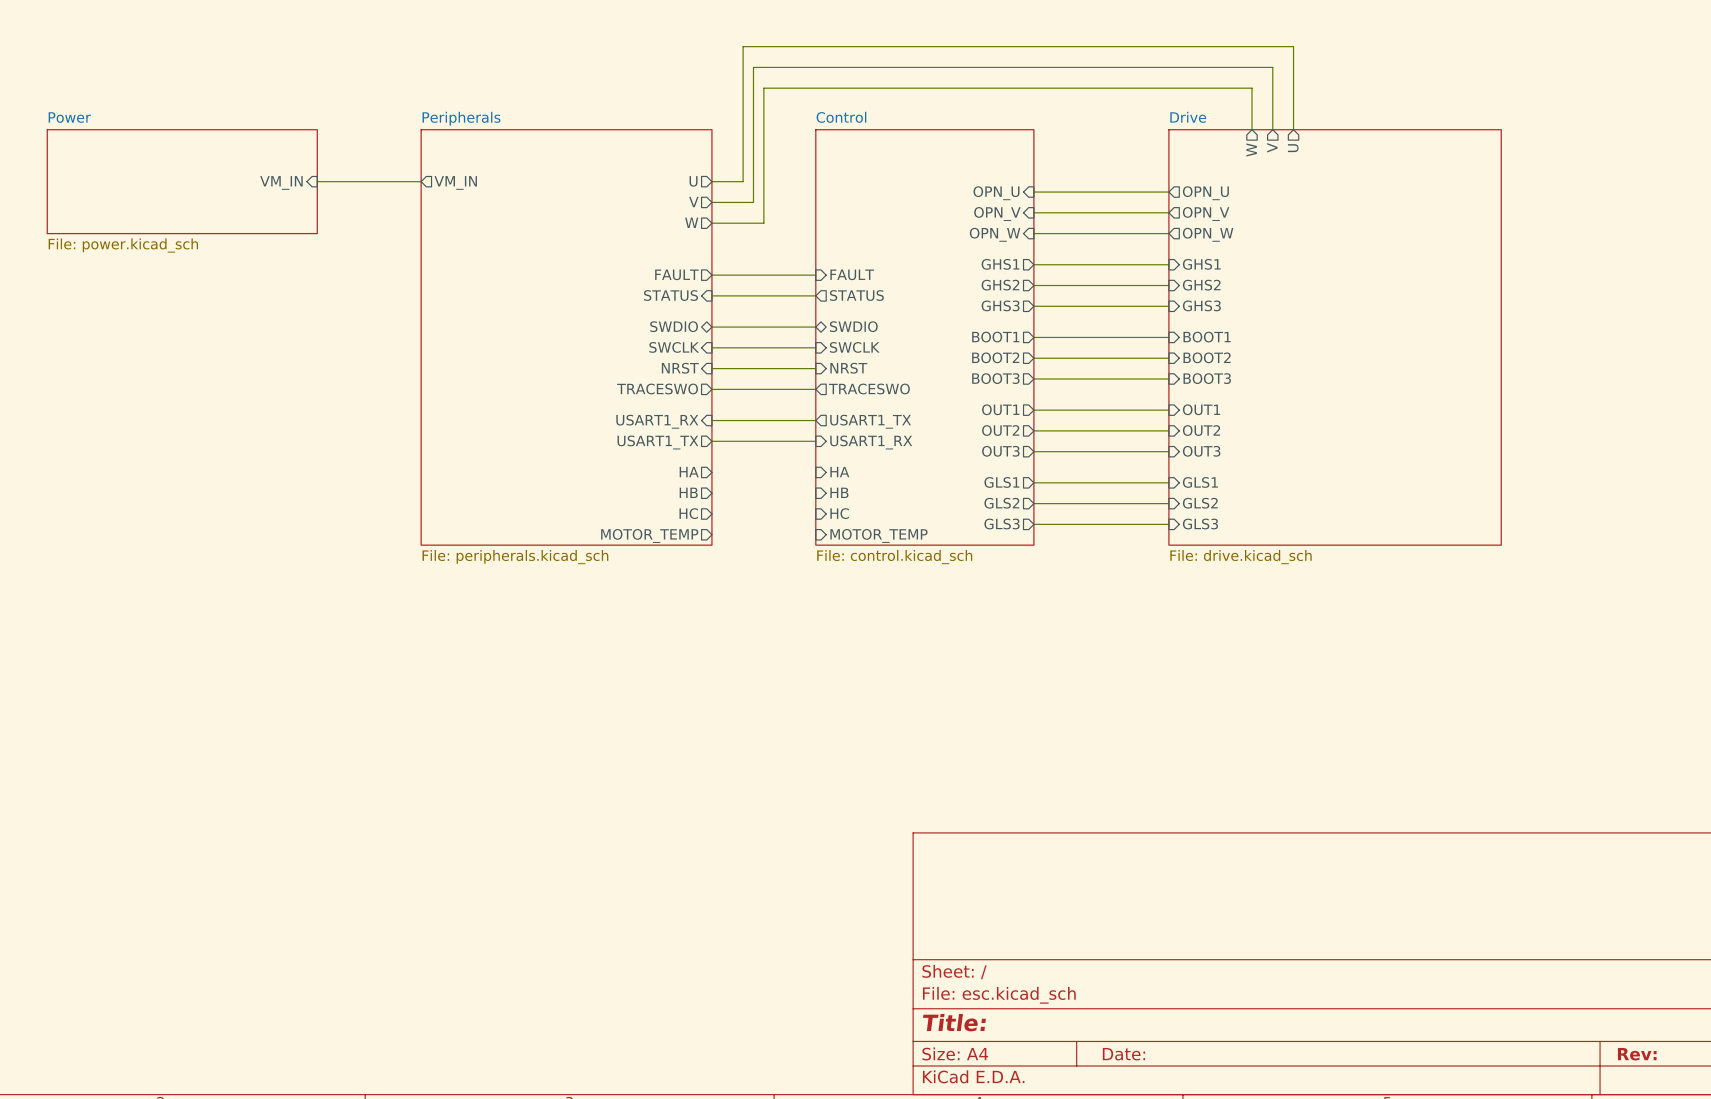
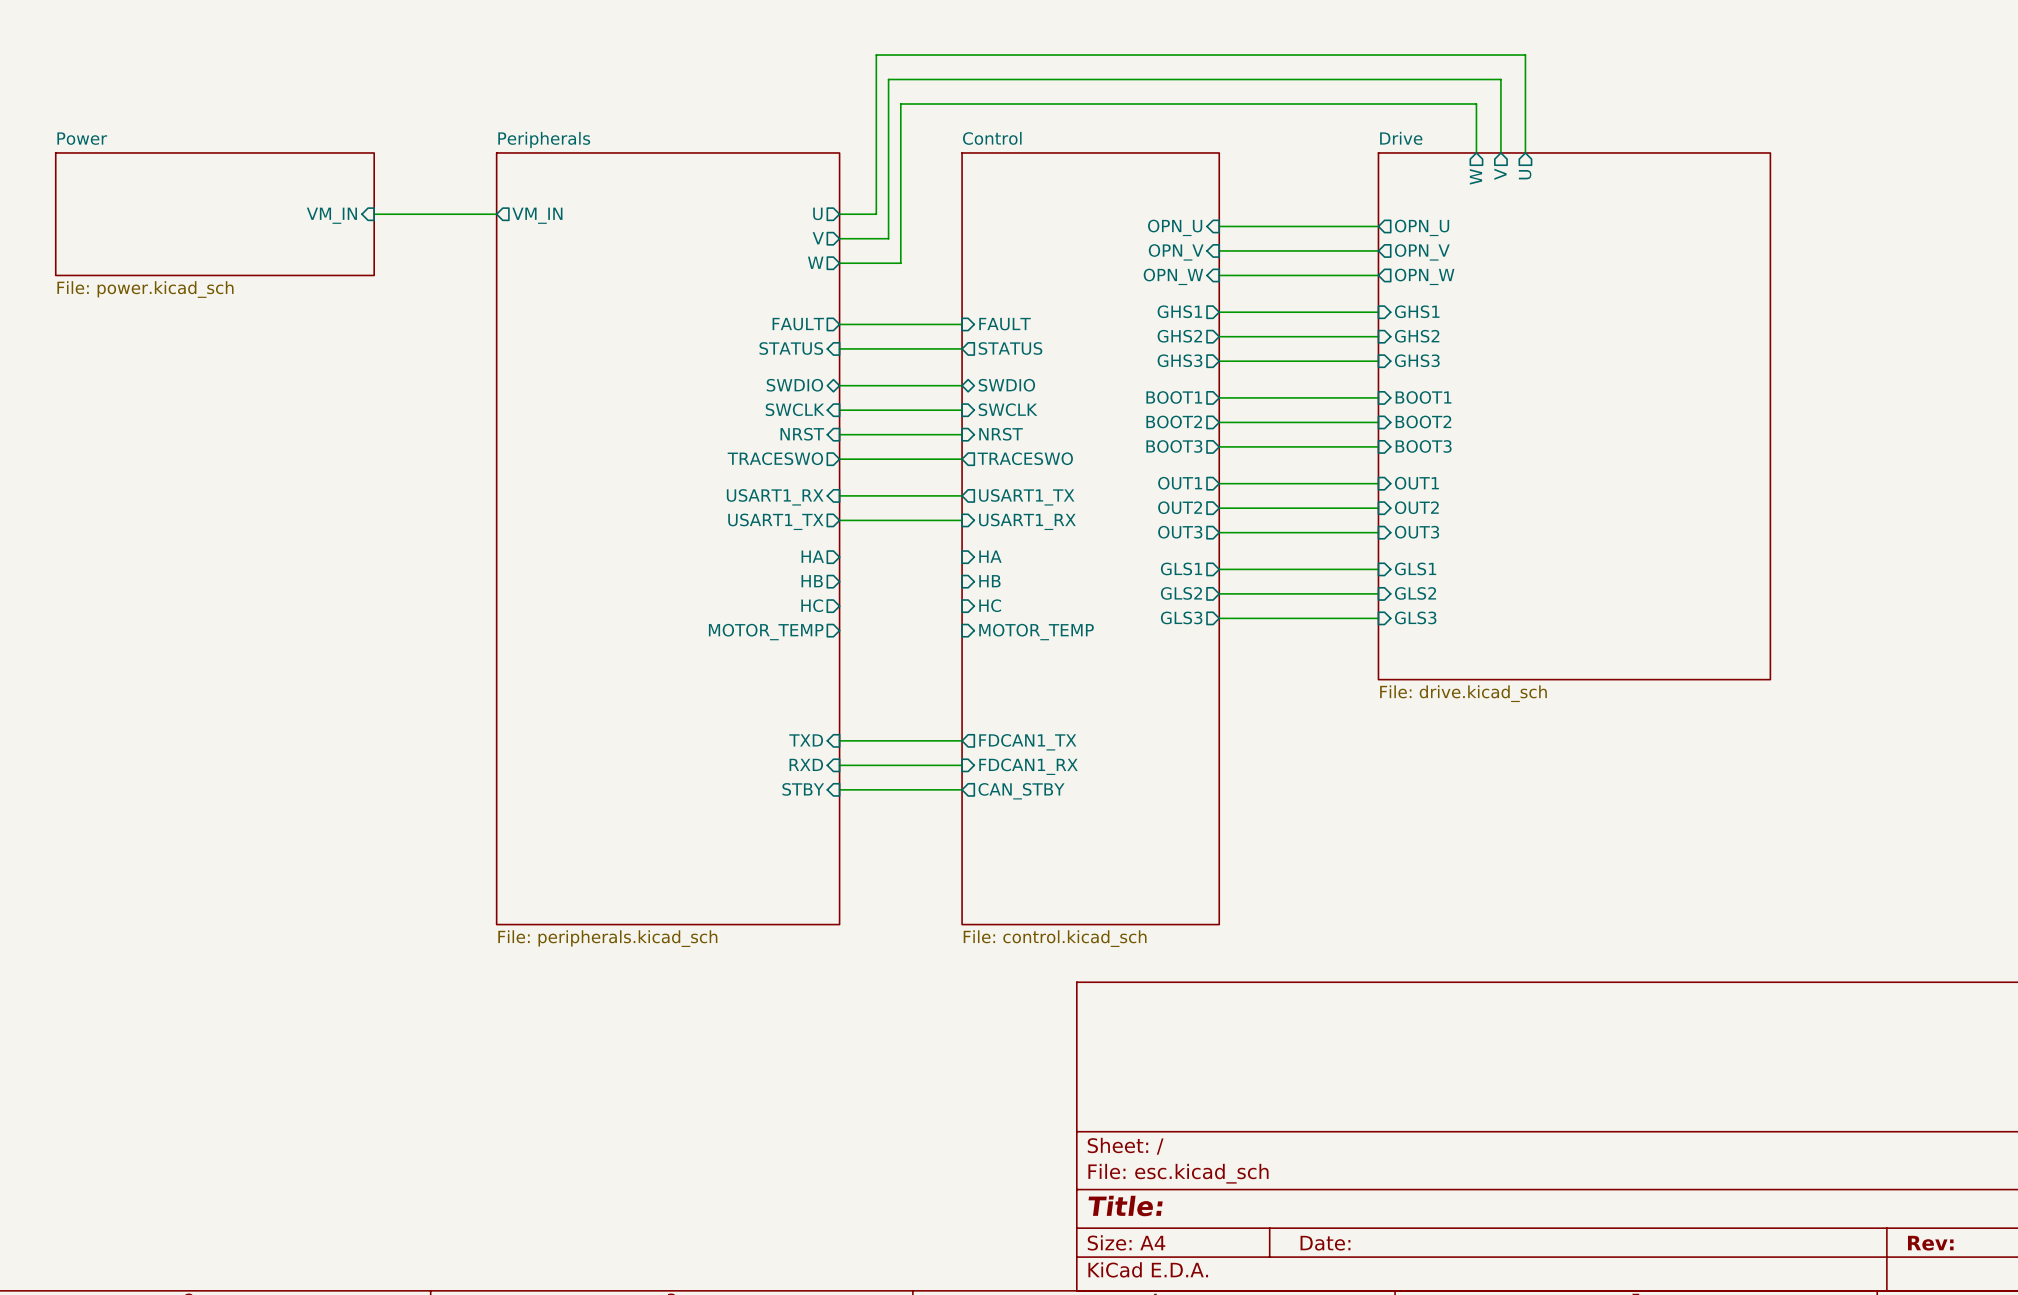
sheet Peripherals: File: peripherals.kicad_sch (566, 337) -> none
sheet Control: File: control.kicad_sch (924, 337) -> none
sheet Drive: File: drive.kicad_sch (1335, 337) -> none
sheet Drive: none -> File: drive.kicad_sch (1574, 416)
sheet Peripherals: none -> File: peripherals.kicad_sch (668, 538)
sheet Control: none -> File: control.kicad_sch (1090, 538)
sheet pin: none -> TXD (806, 740)
wire: none -> (839, 740) (962, 740)
sheet pin: none -> FDCAN1_TX (1027, 742)
sheet pin: none -> RXD (806, 764)
wire: none -> (839, 765) (962, 765)
sheet pin: none -> FDCAN1_RX (1028, 766)
sheet pin: none -> STBY (803, 789)
wire: none -> (839, 789) (962, 789)
sheet pin: none -> CAN_STBY (1021, 791)

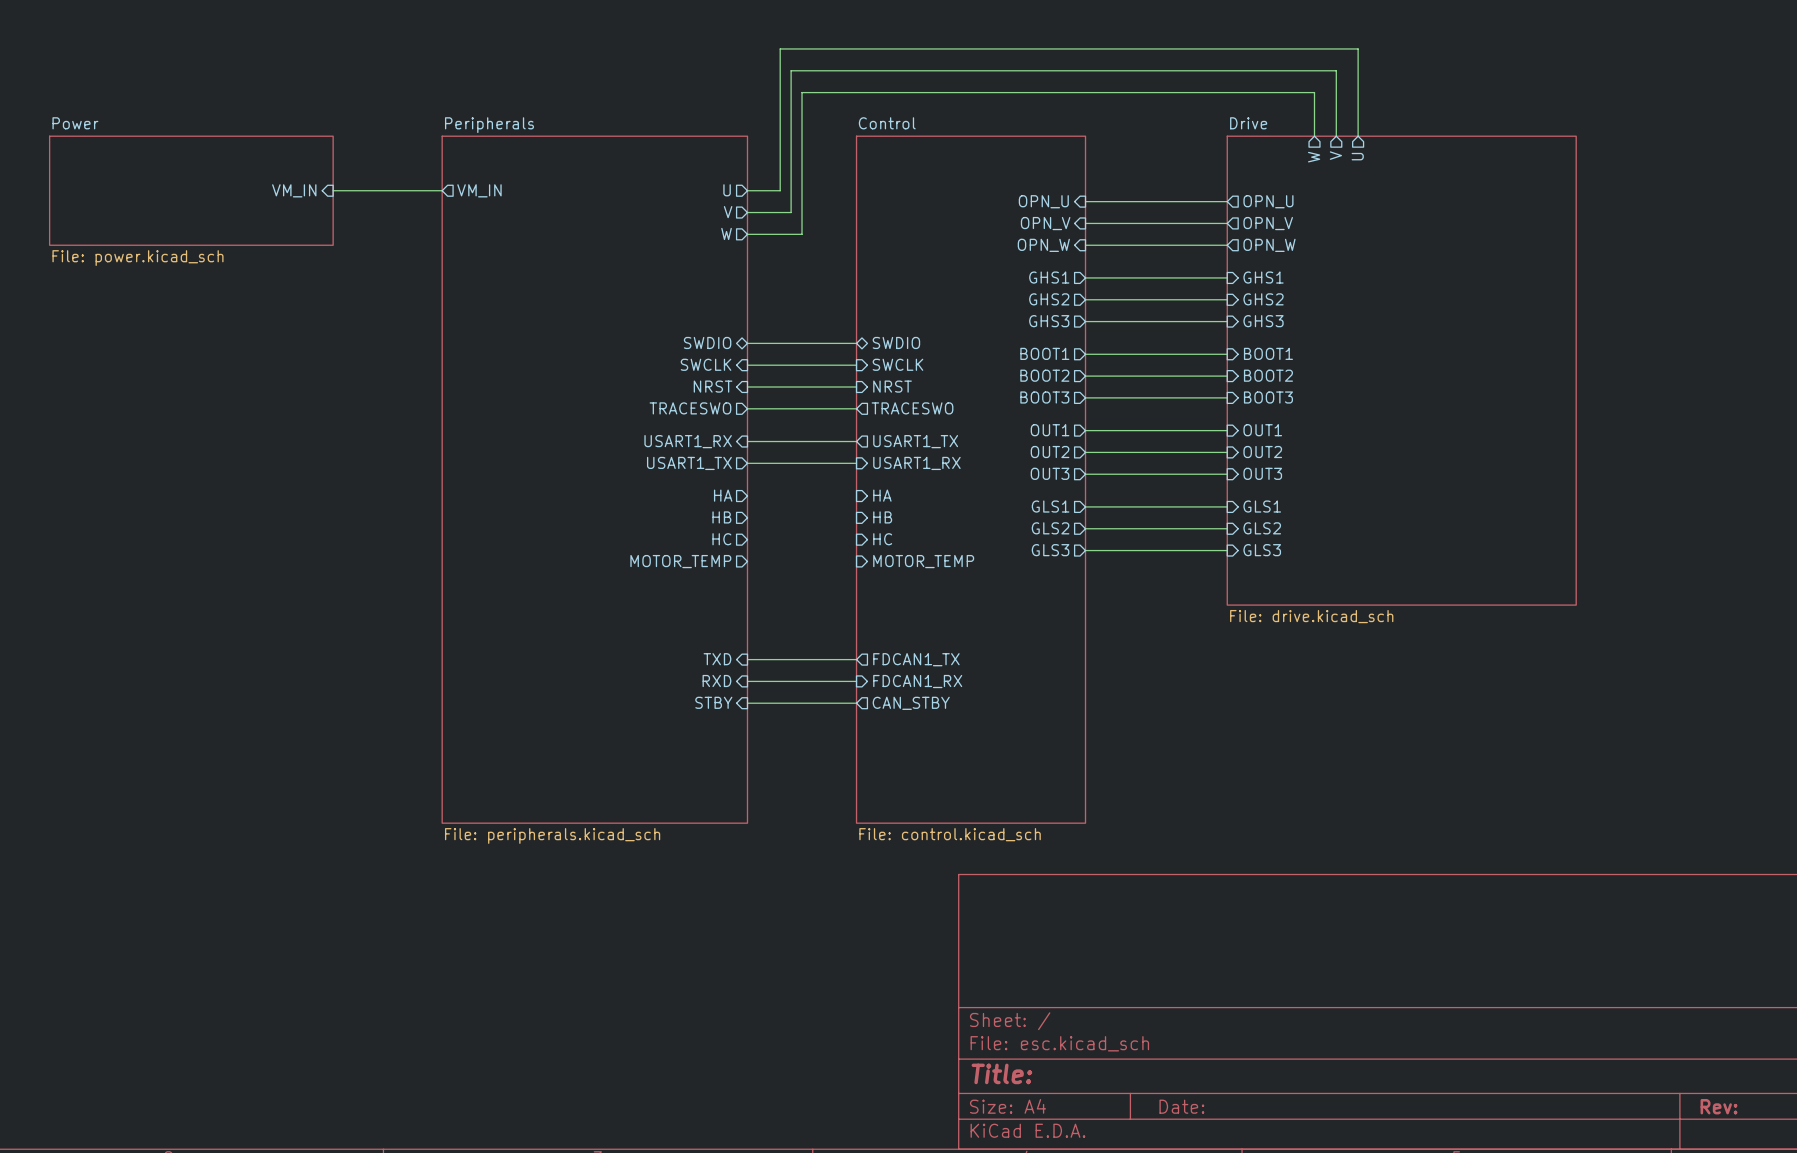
sheet pin: FAULT (798, 324) -> none
wire: (839, 324) (962, 324) -> none
sheet pin: FAULT (1004, 324) -> none
sheet pin: STATUS (791, 348) -> none
wire: (839, 348) (962, 348) -> none
sheet pin: STATUS (1010, 348) -> none

